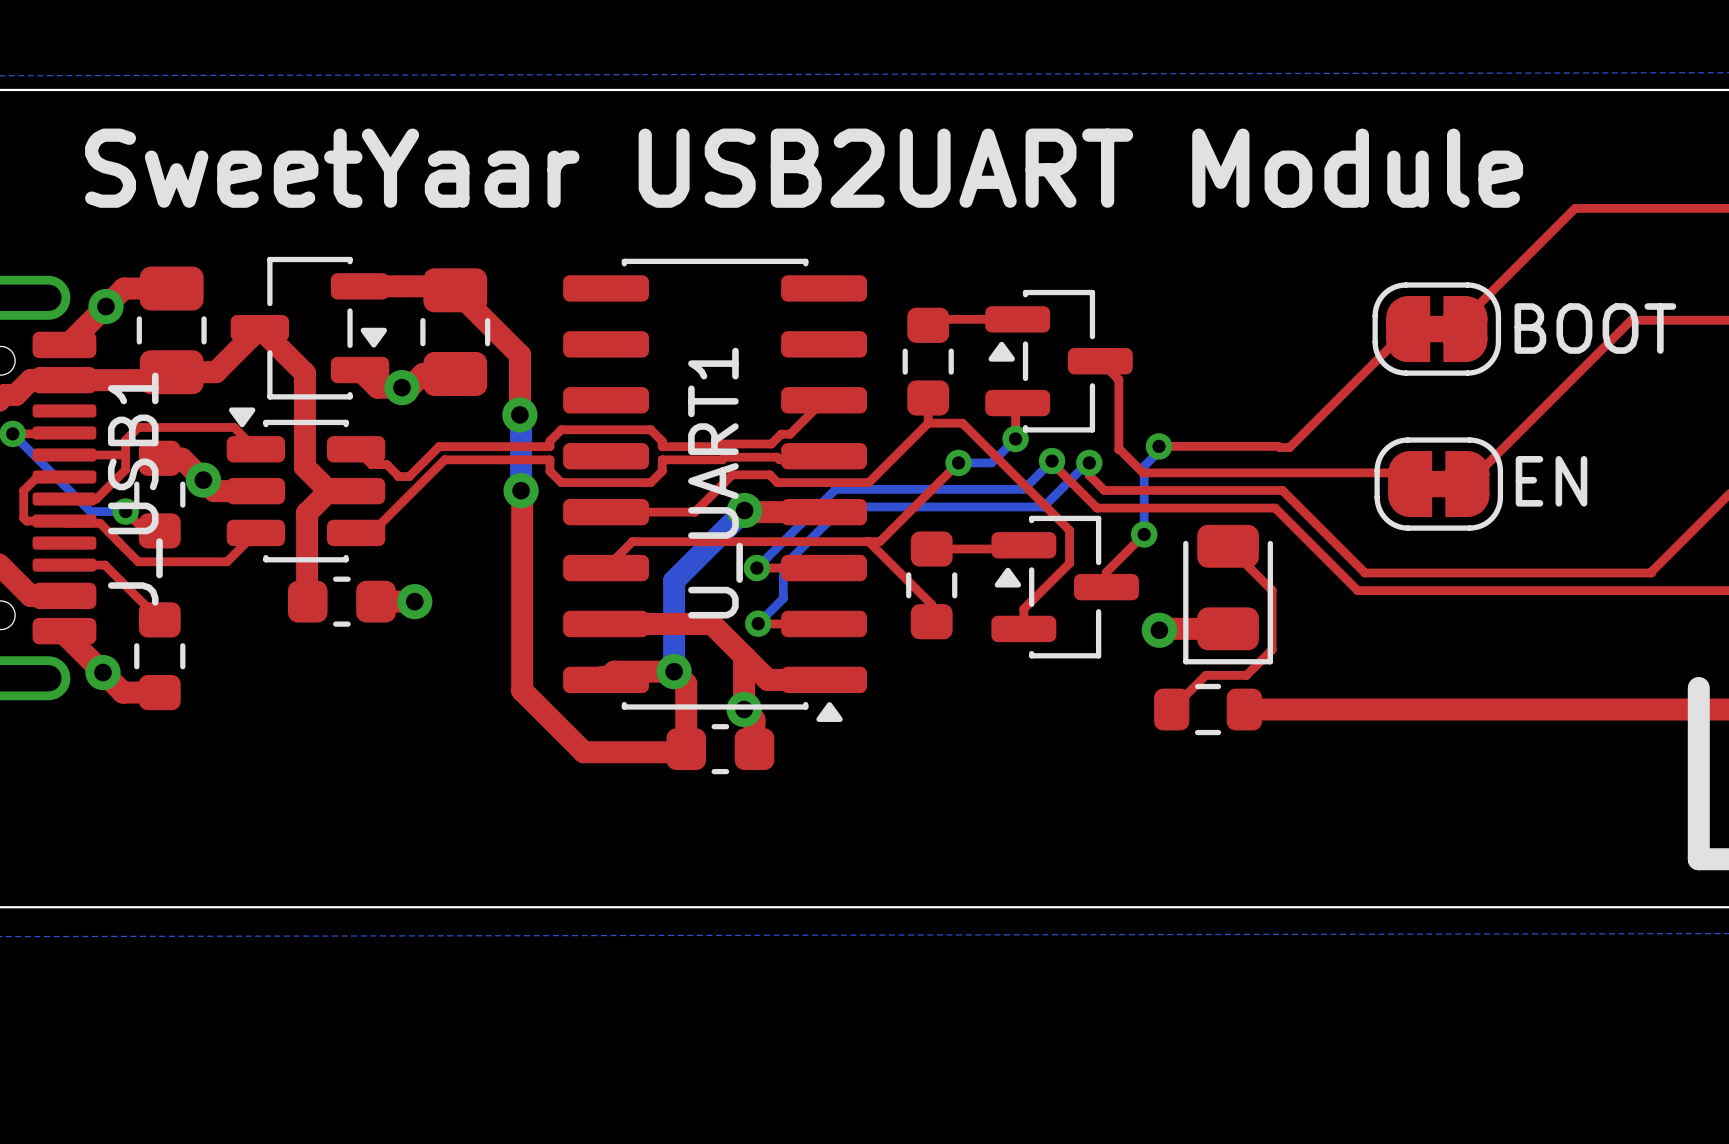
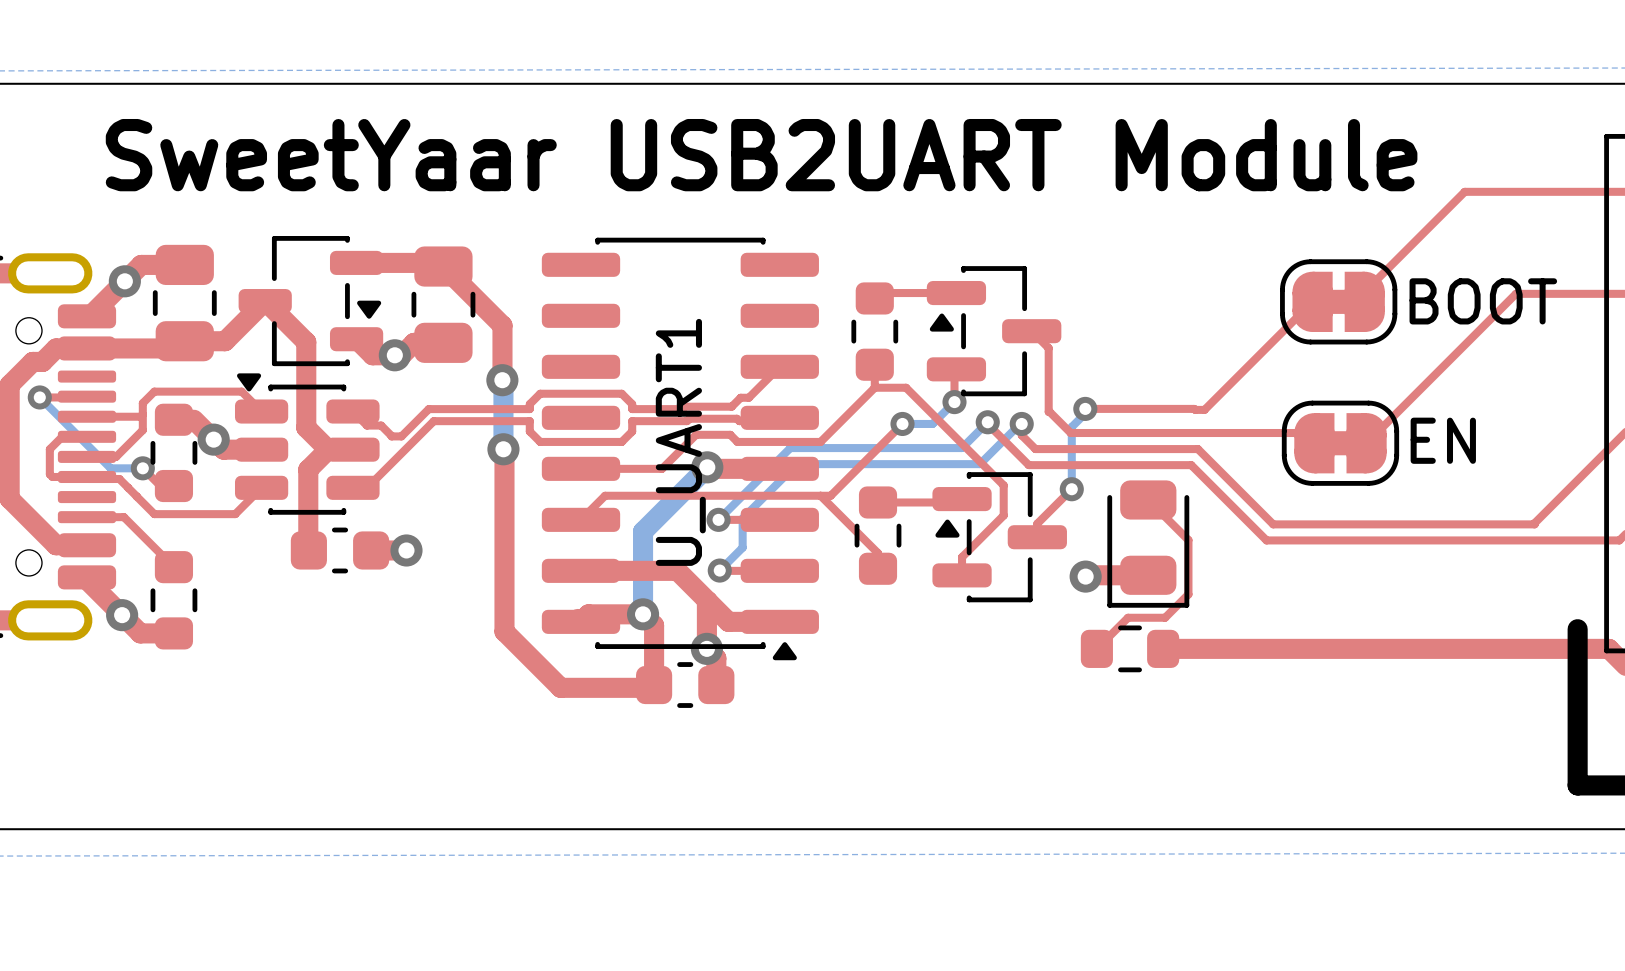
J_USB1 name: J_USB1 (135, 489) -> none

